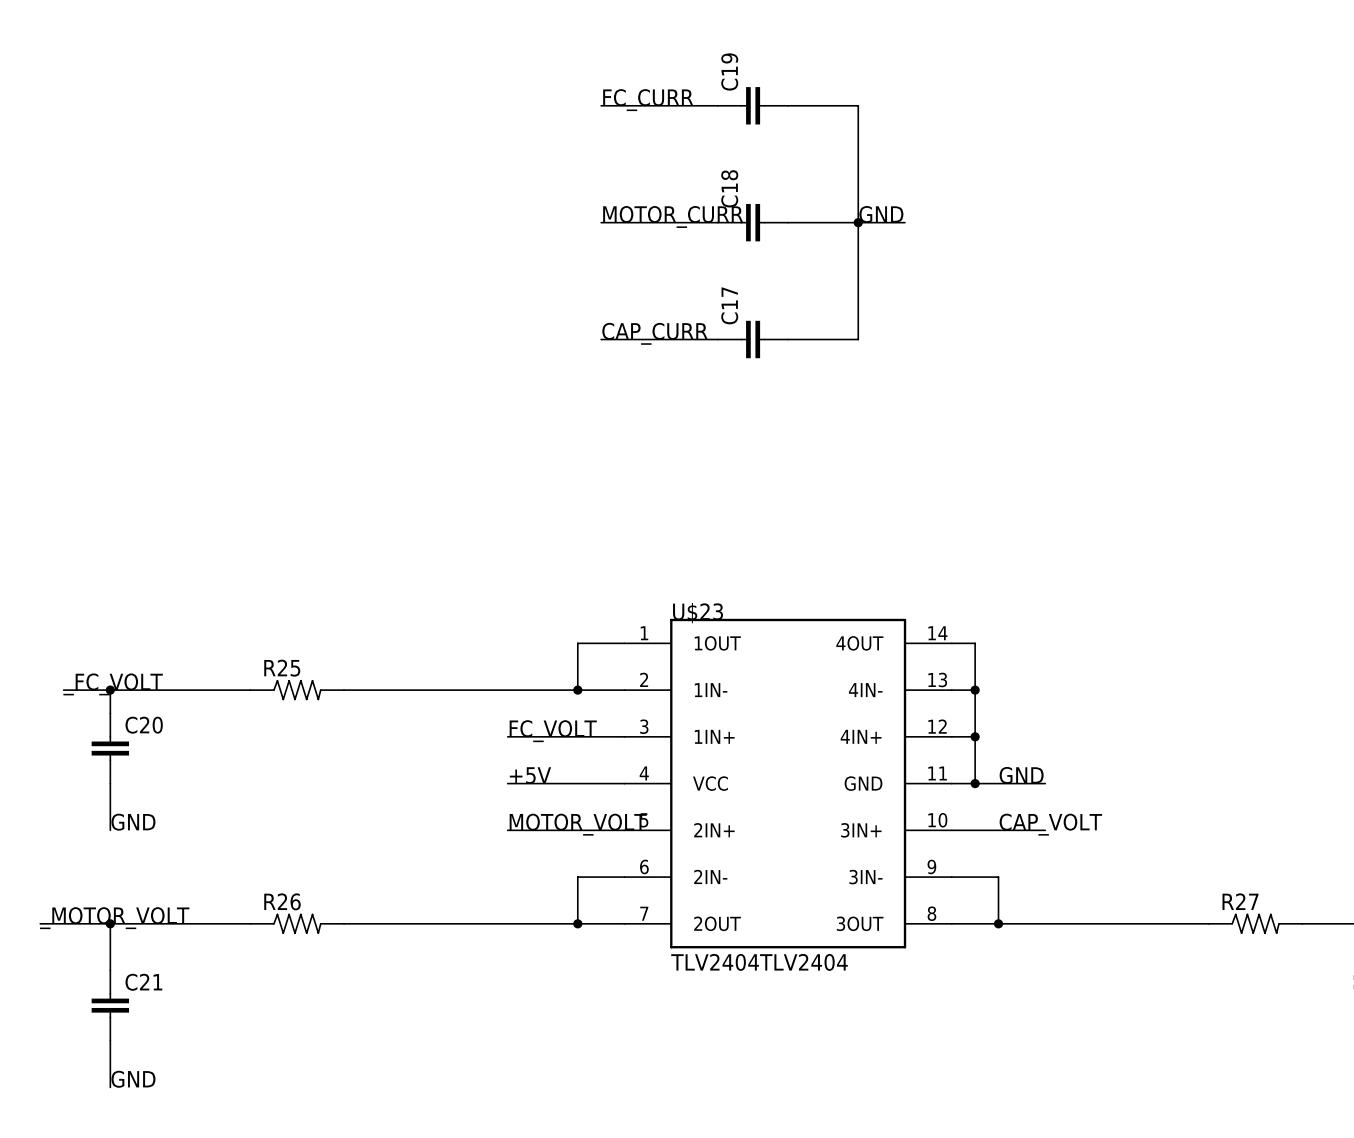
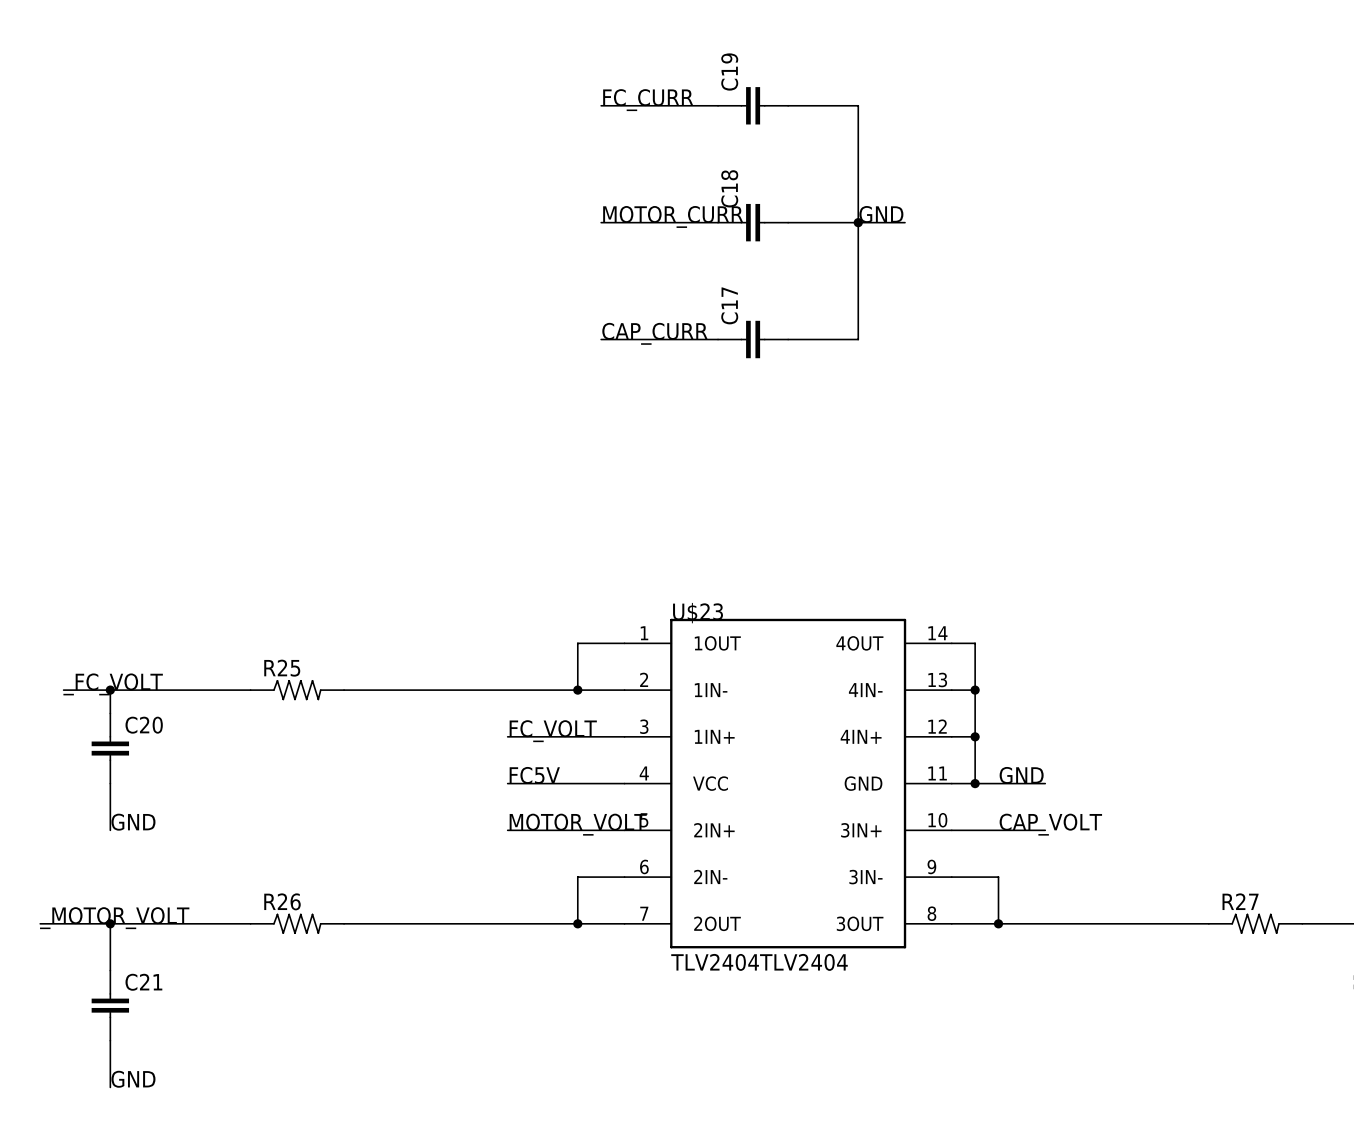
label: +5V (530, 775) -> FC5V (534, 775)

